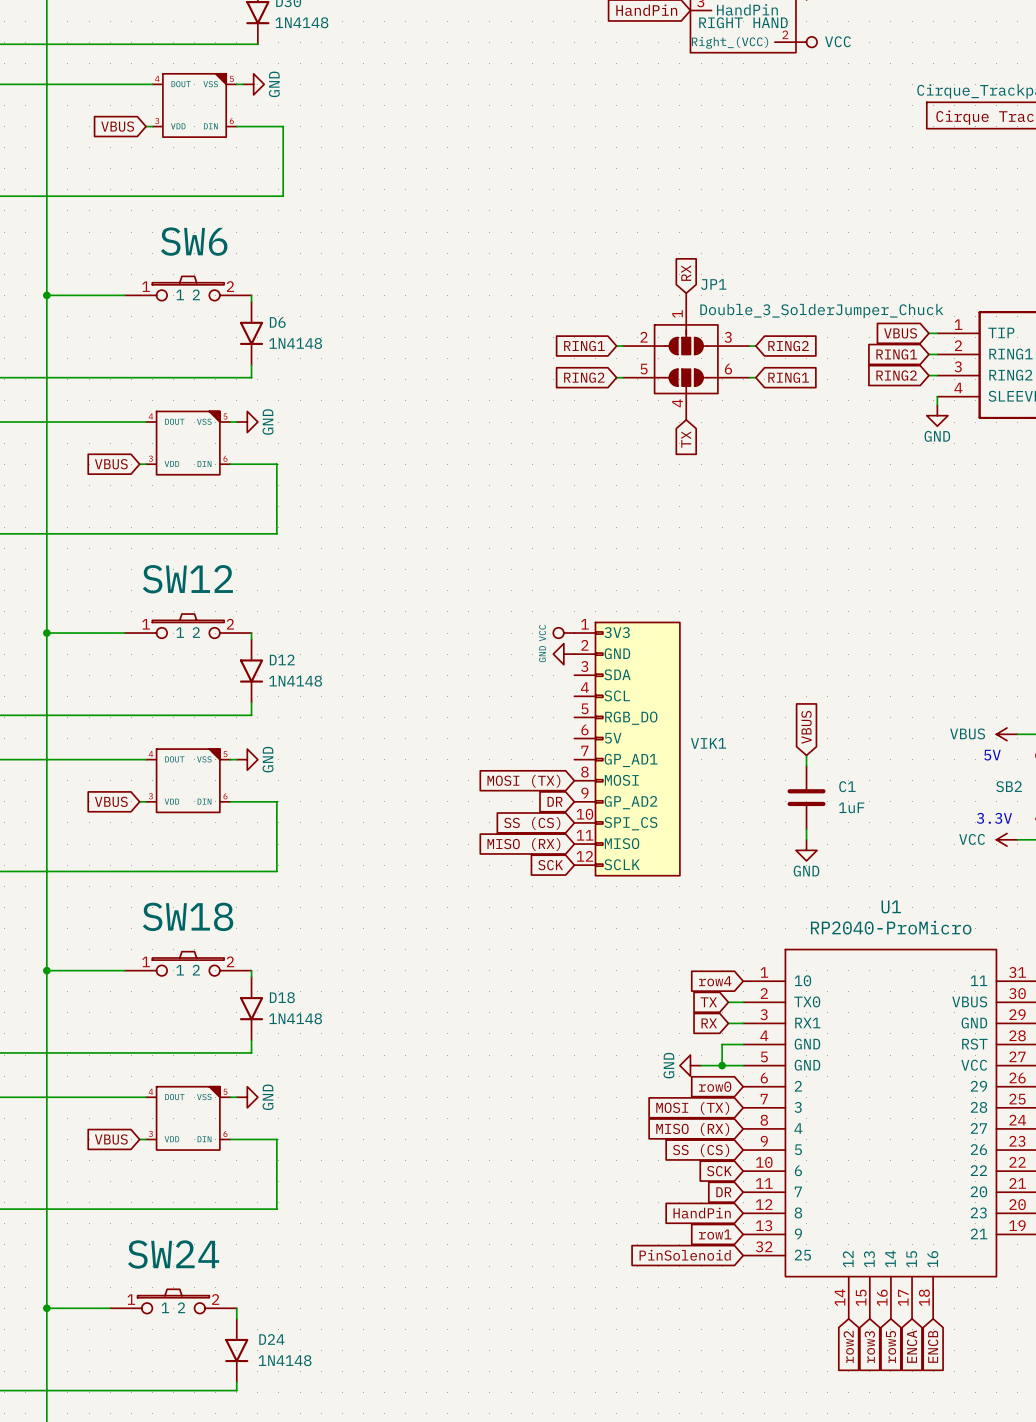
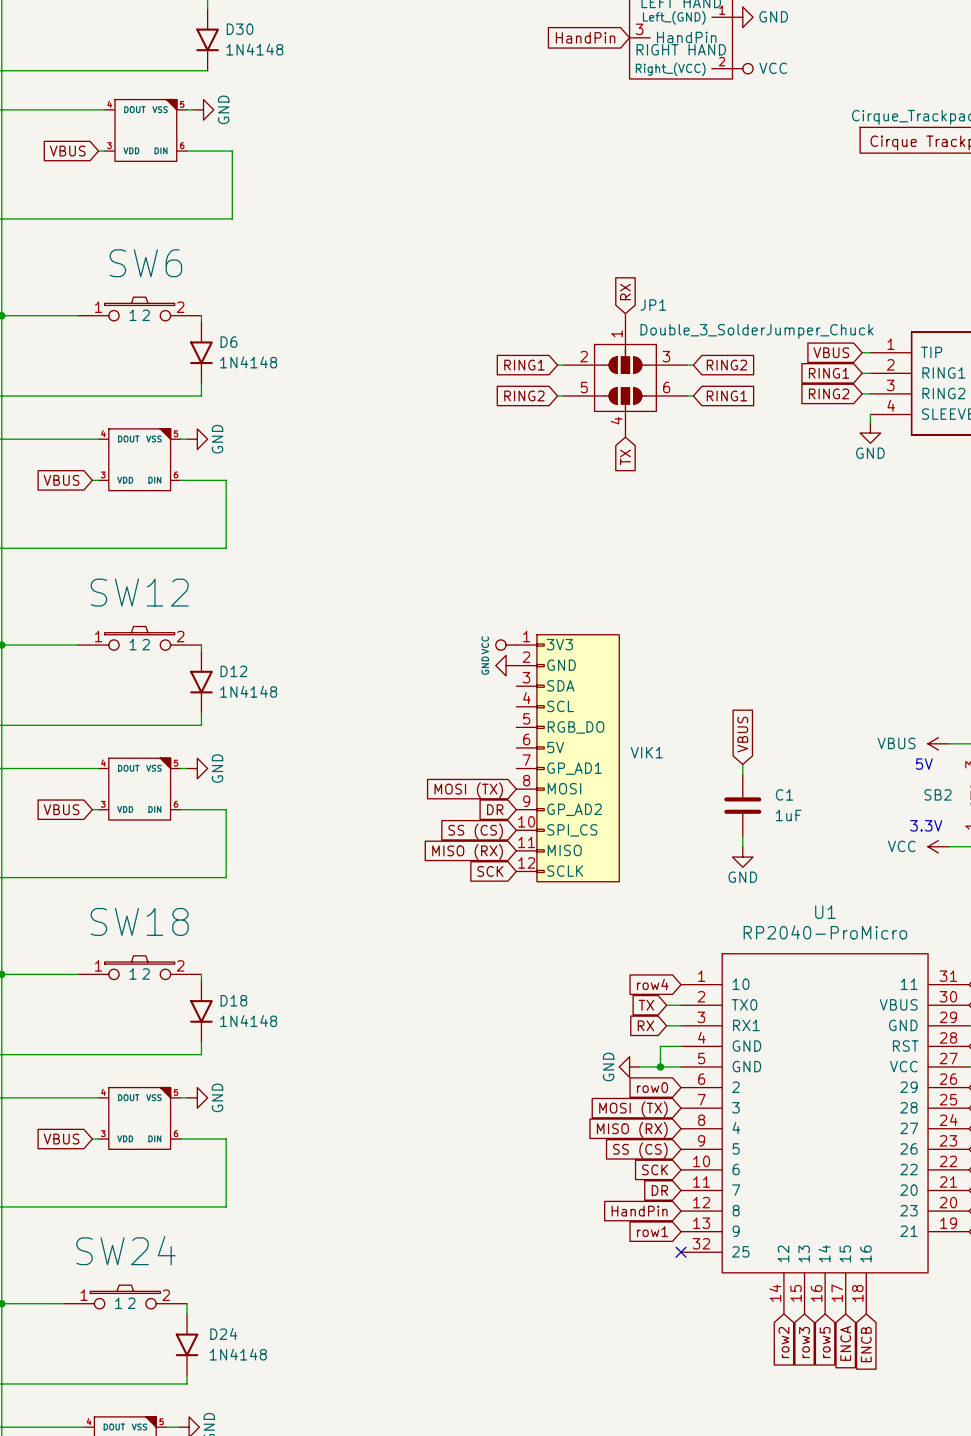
global label: PinSolenoid (685, 1255) -> none
no-connect mark: none -> (681, 1252)

